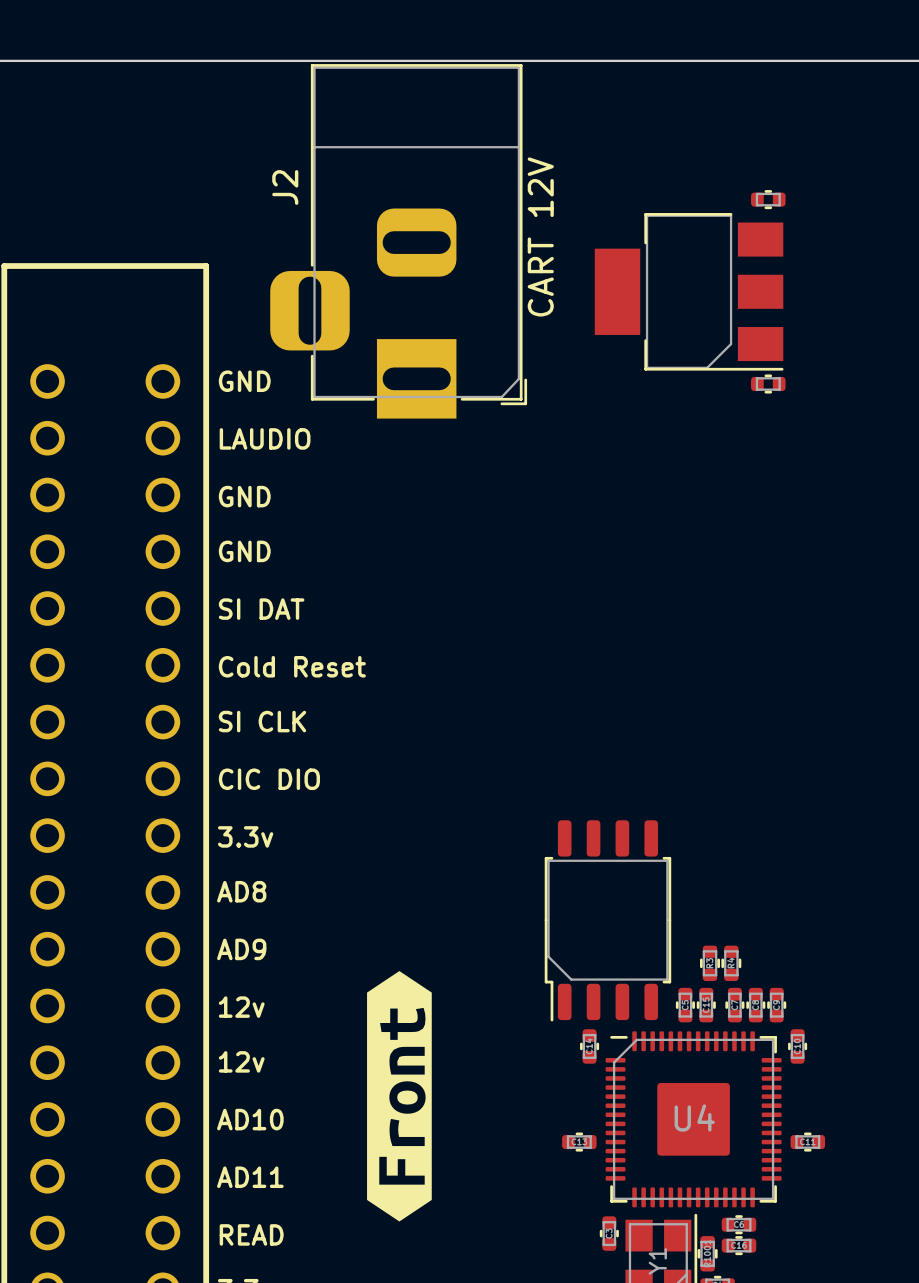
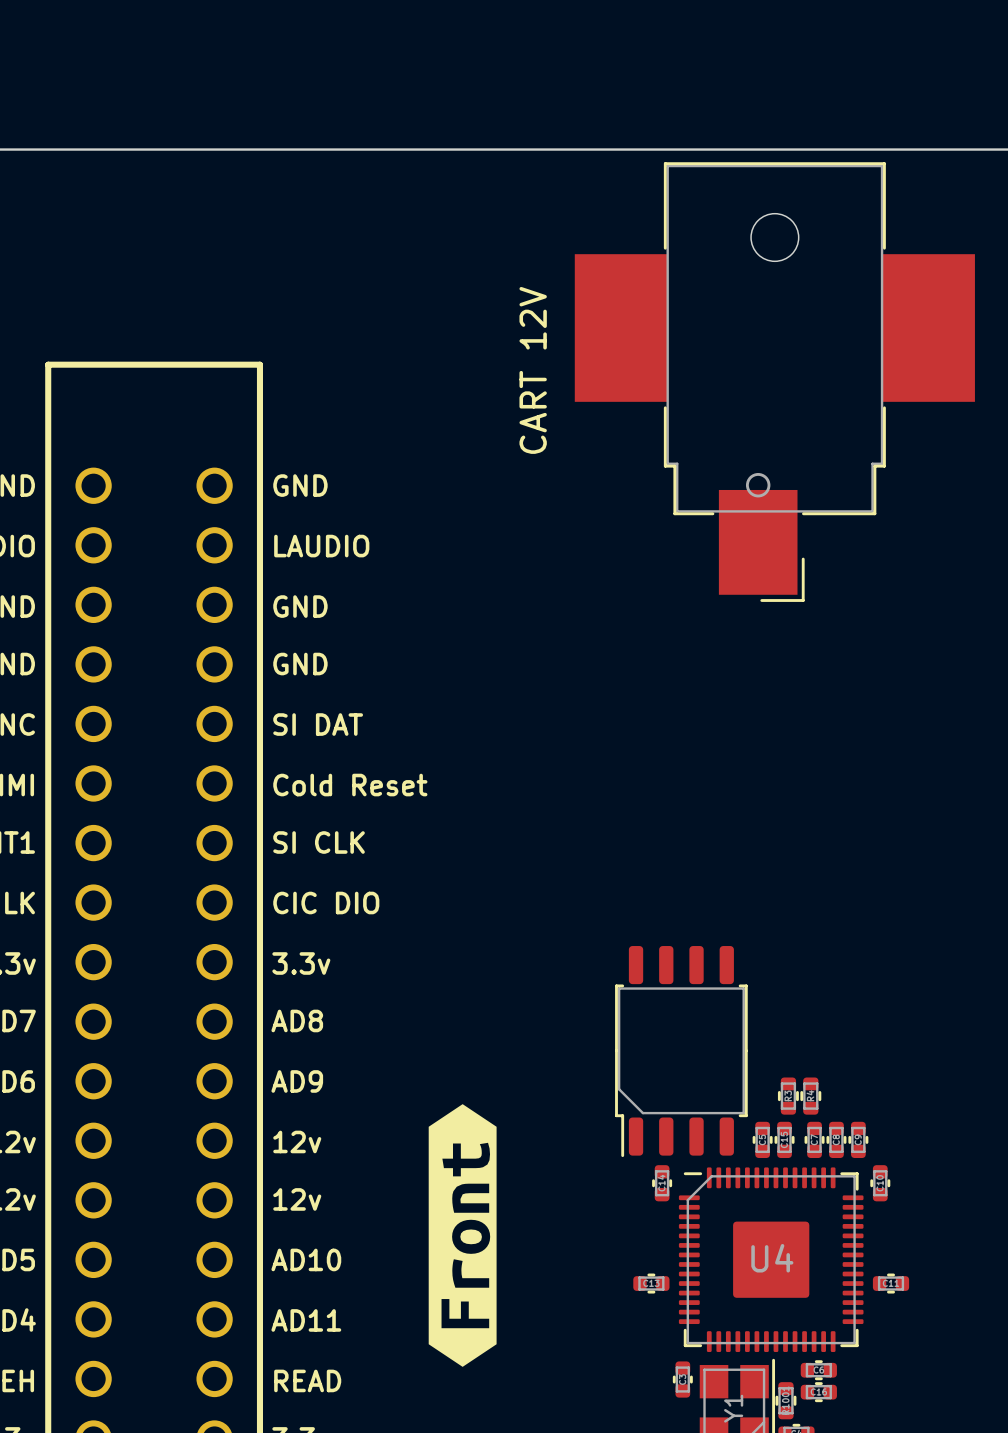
part: (768, 199) -> none
J2: CART 12V (398, 241) -> none
CART 12V: none -> (774, 382)
part: (689, 291) -> none
part: (768, 383) -> none

